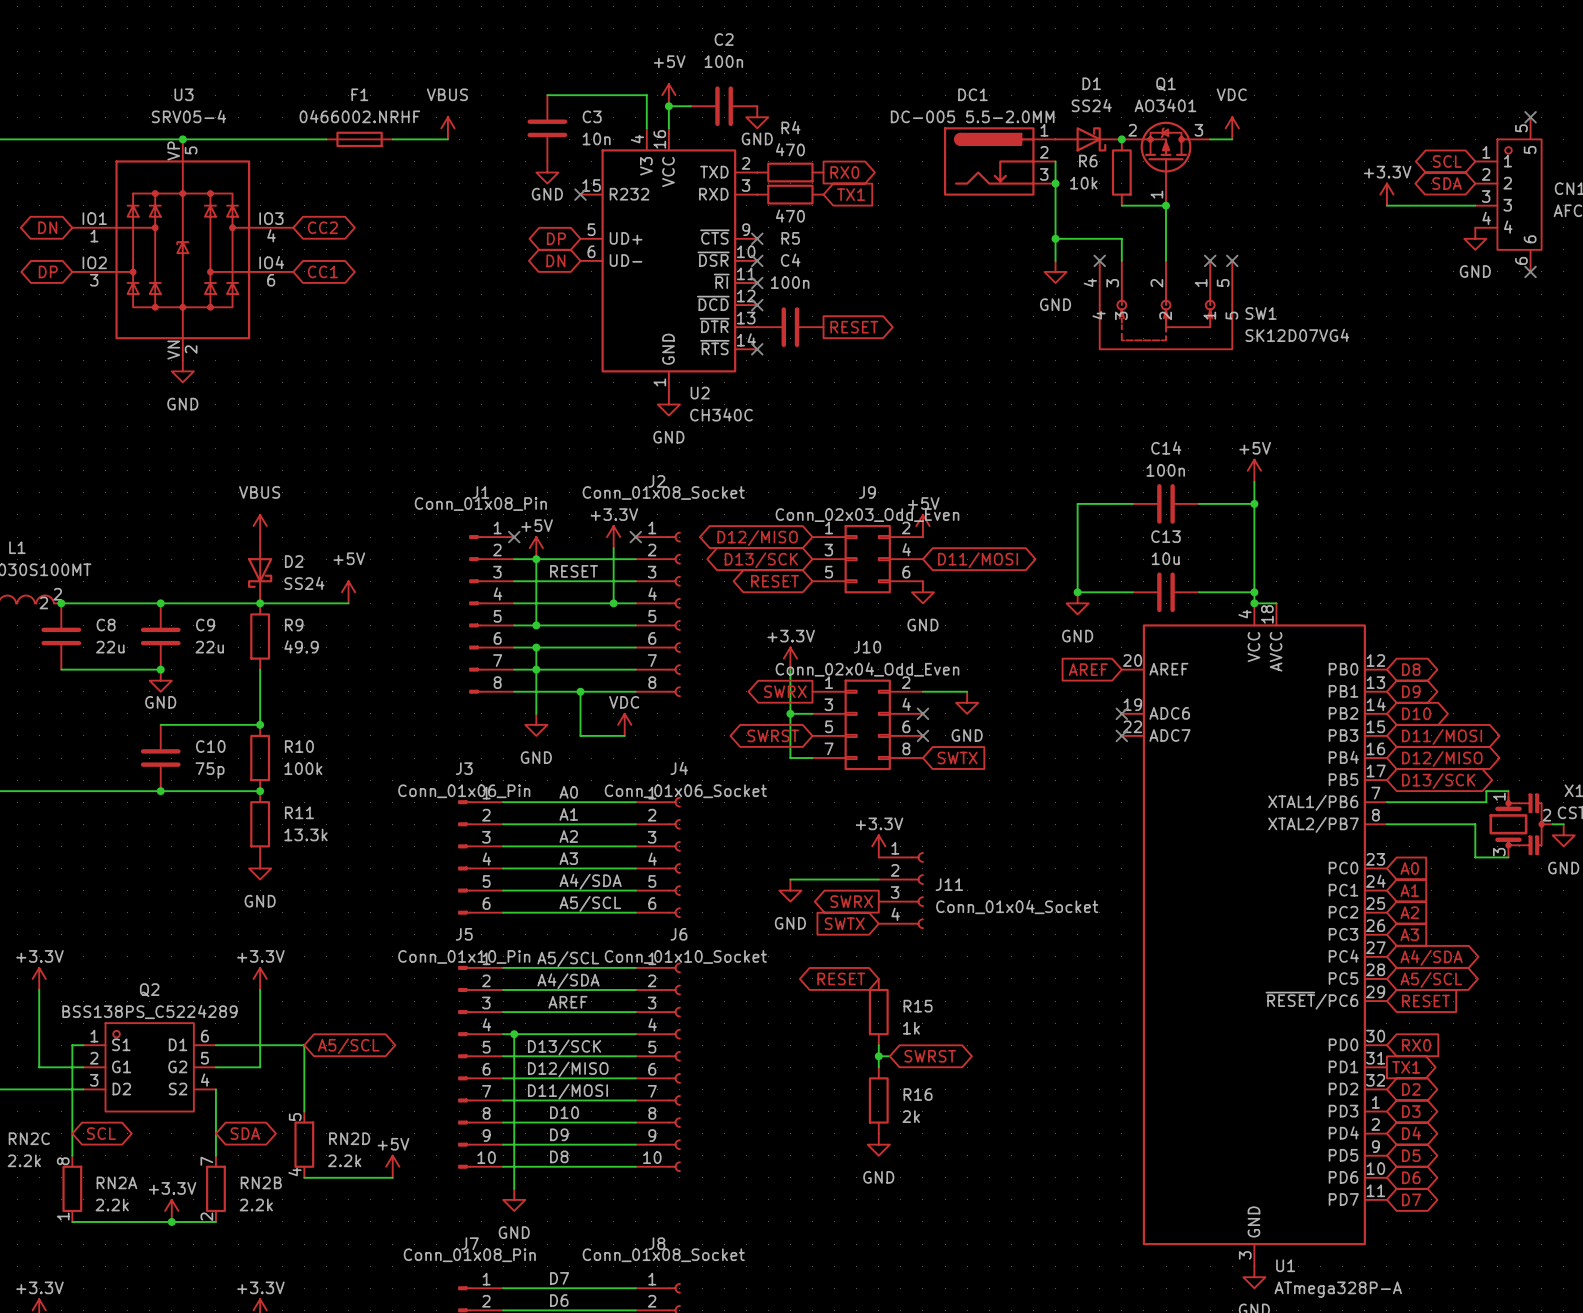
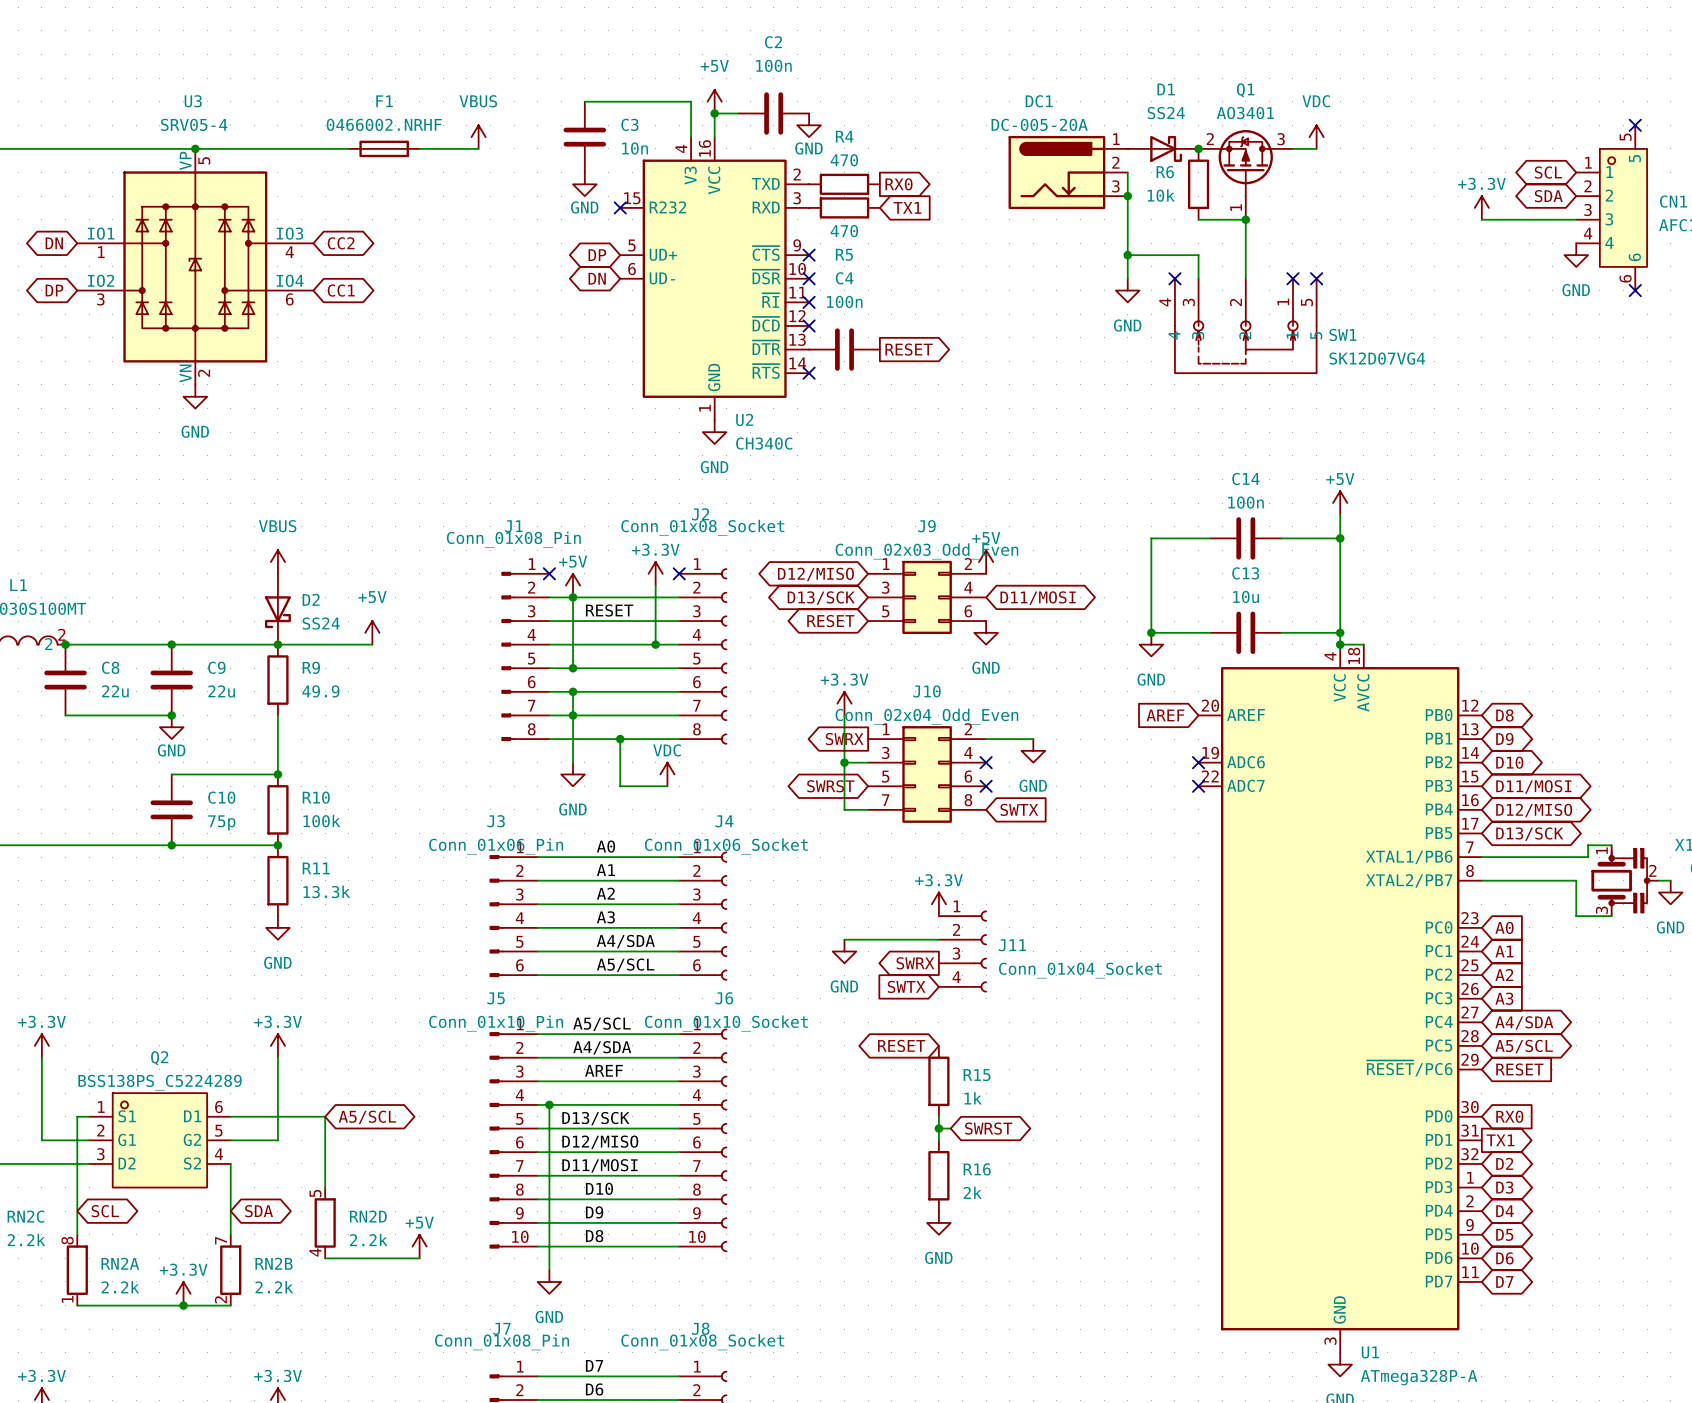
DC1 value: DC-005 5.5-2.0MM (972, 116) -> DC-005-20A (1039, 124)

